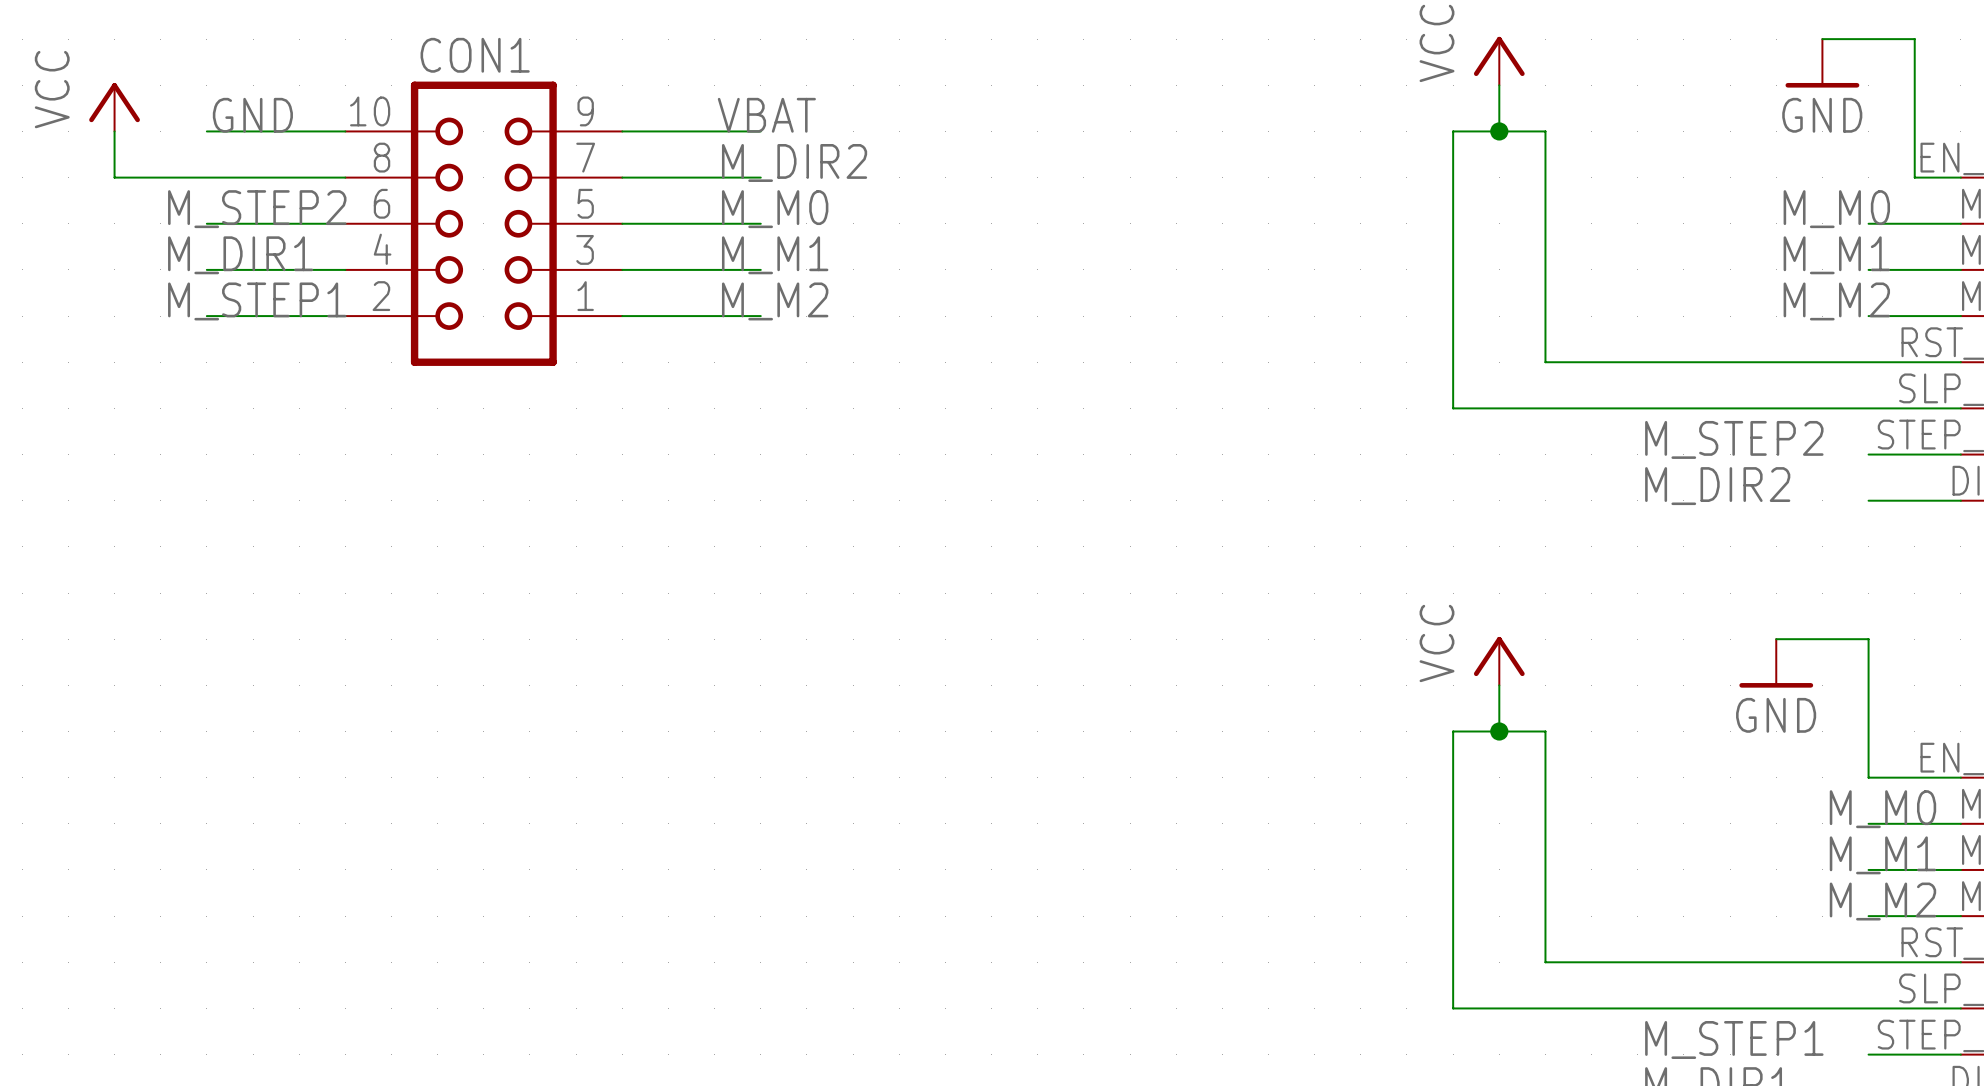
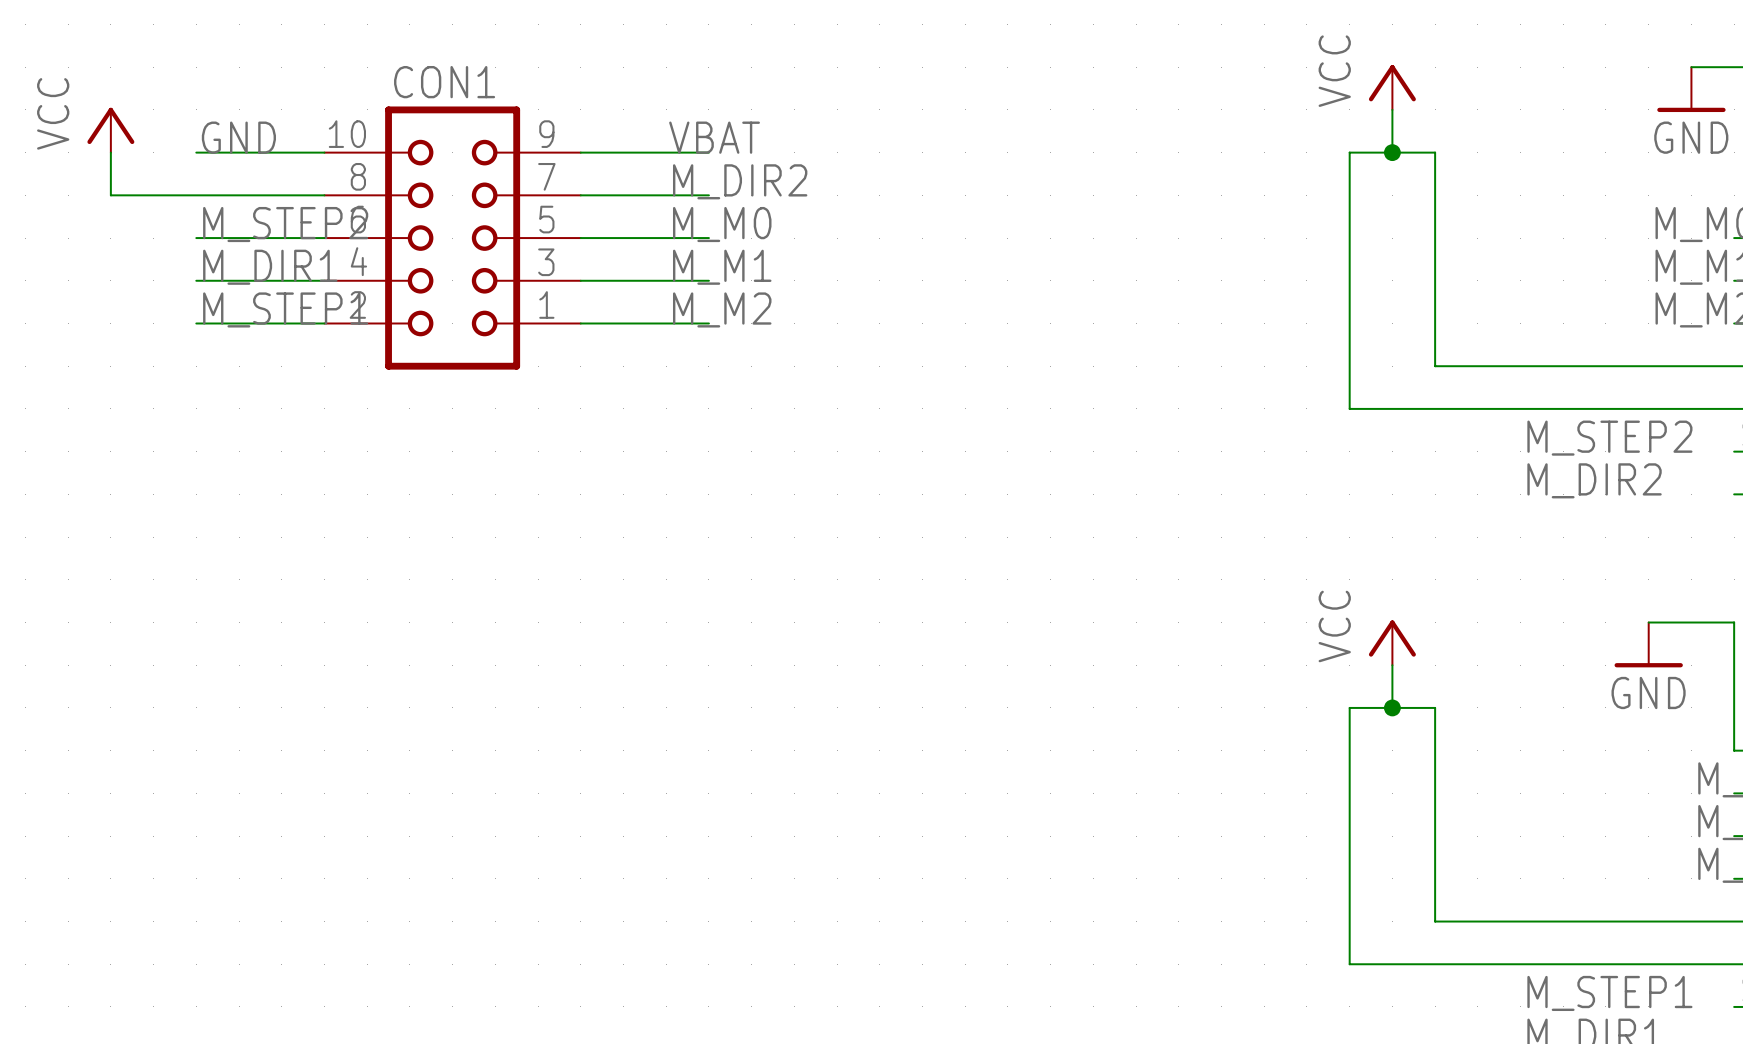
label position: M_STEP2 (257, 209) -> M_STEP2 (285, 224)
label position: M_DIR1 (240, 255) -> M_DIR1 (270, 267)
label position: M_STEP1 (257, 301) -> M_STEP1 (285, 309)

